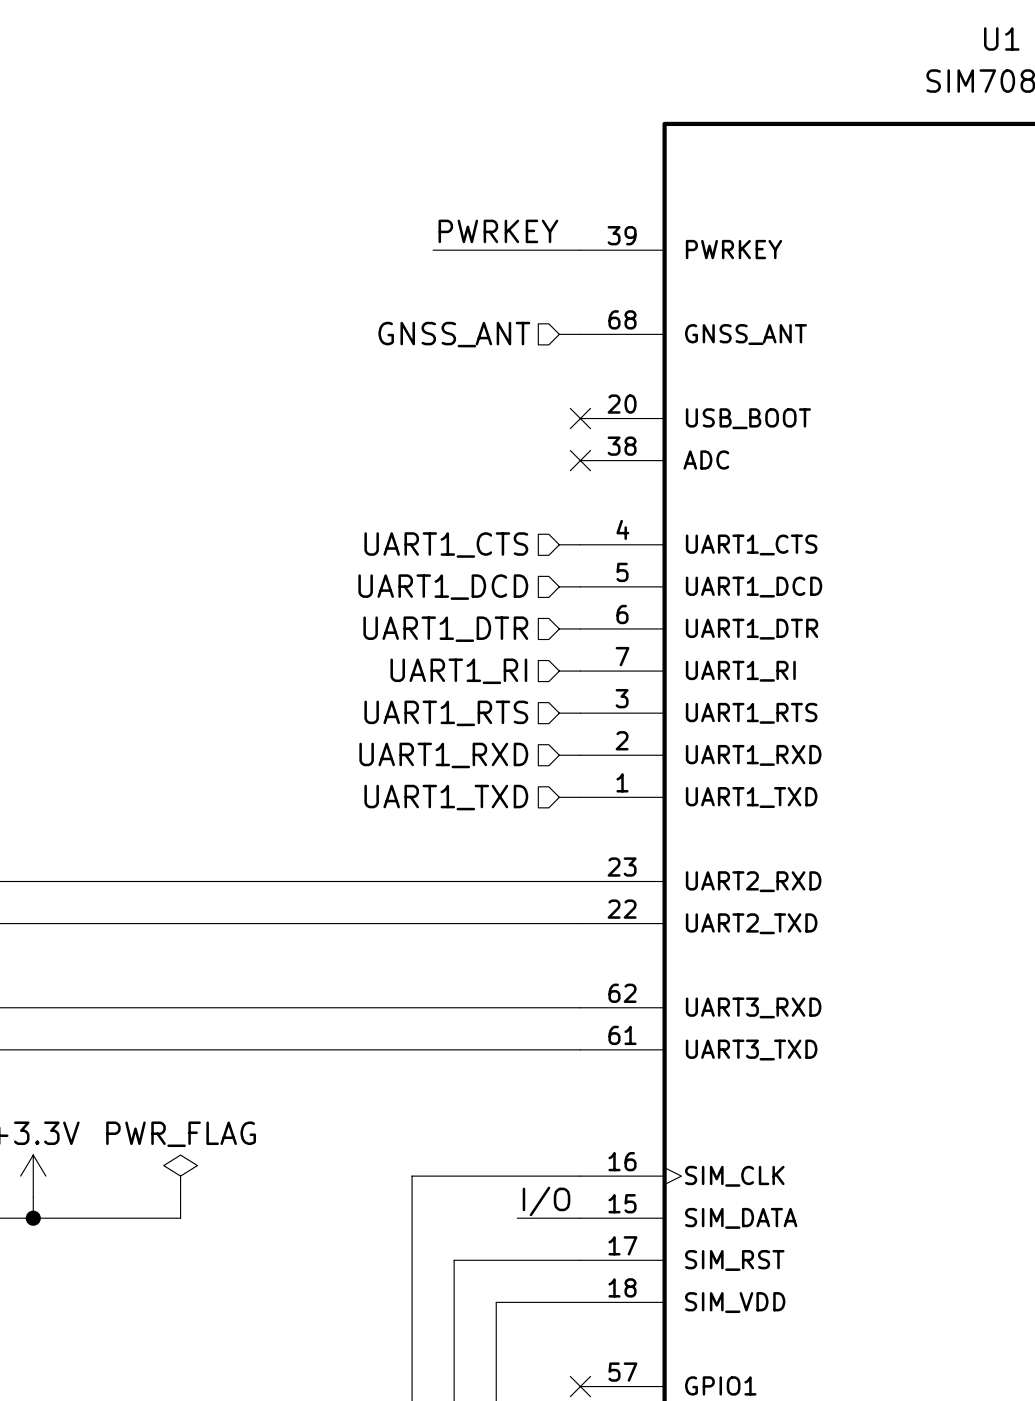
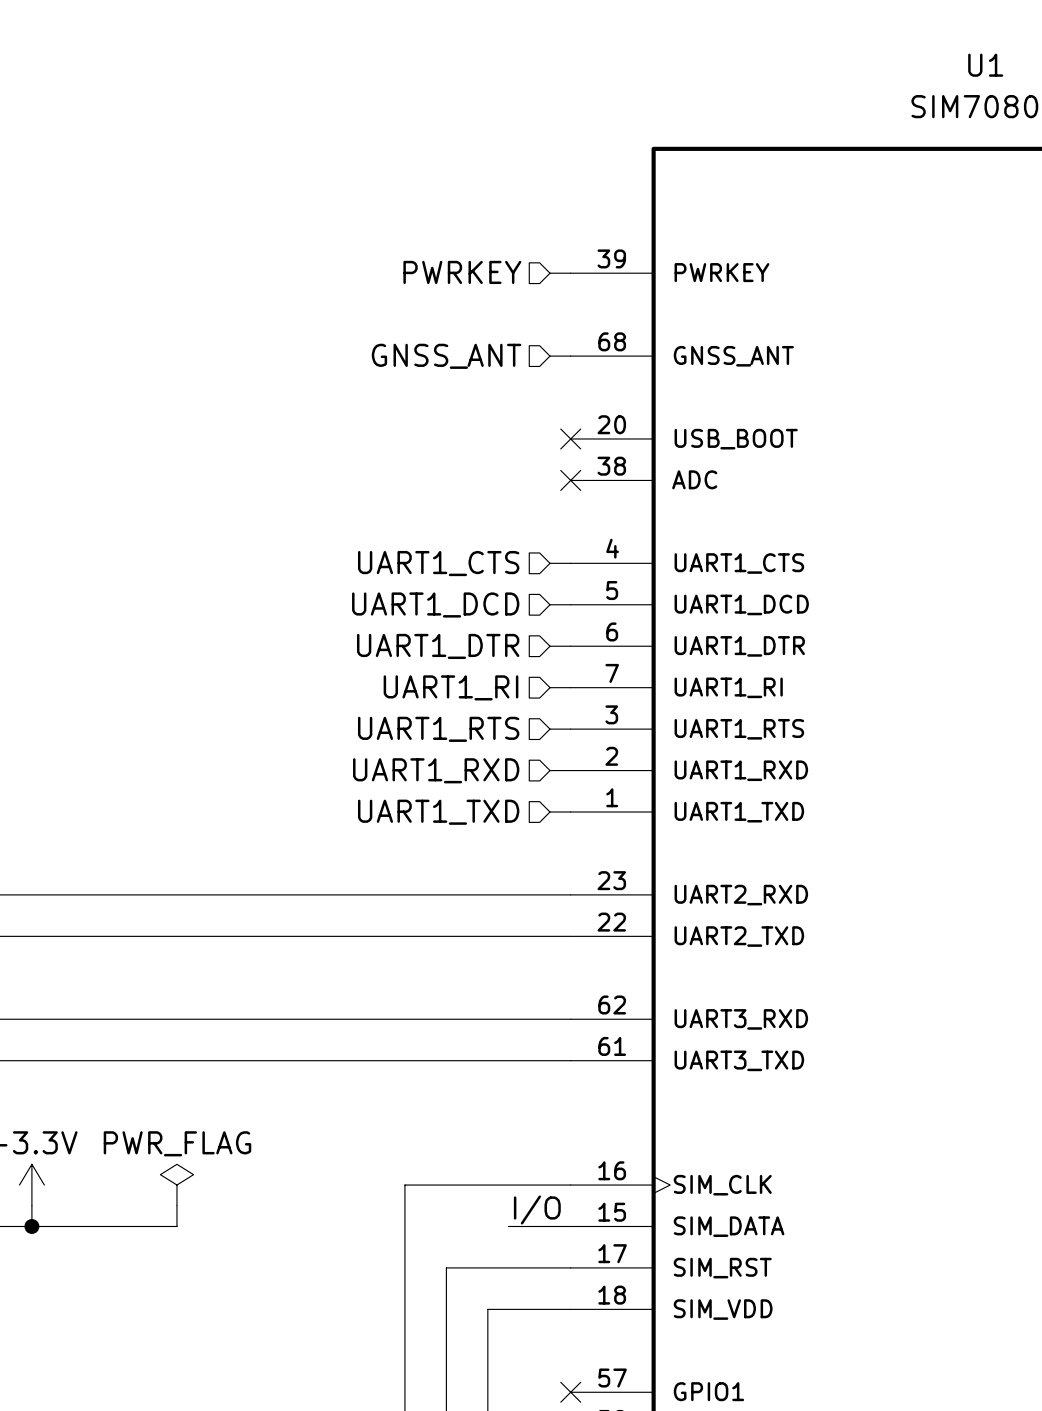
label: PWRKEY (498, 231) -> none
hierarchical label: none -> PWRKEY (462, 272)
wire: (433, 250) (559, 250) -> none

